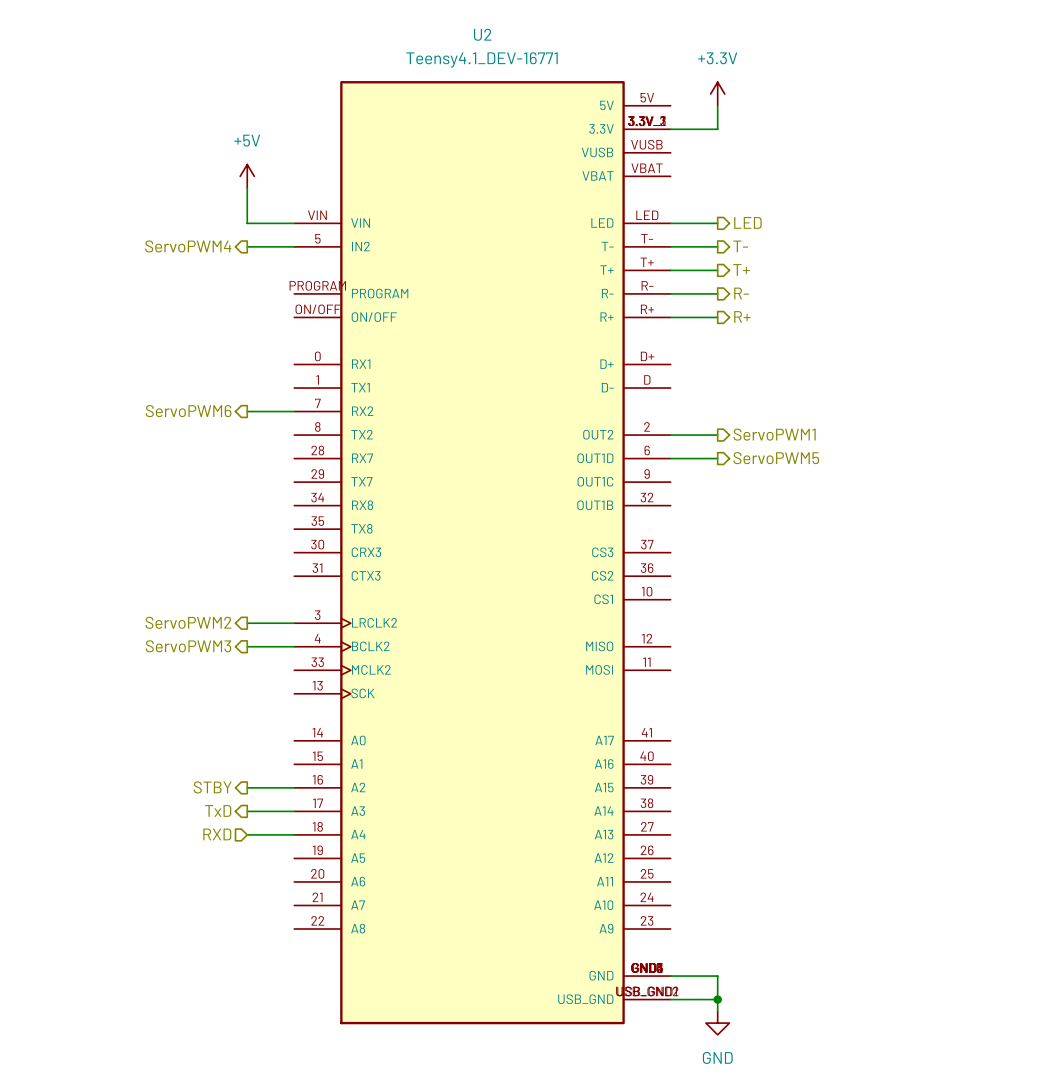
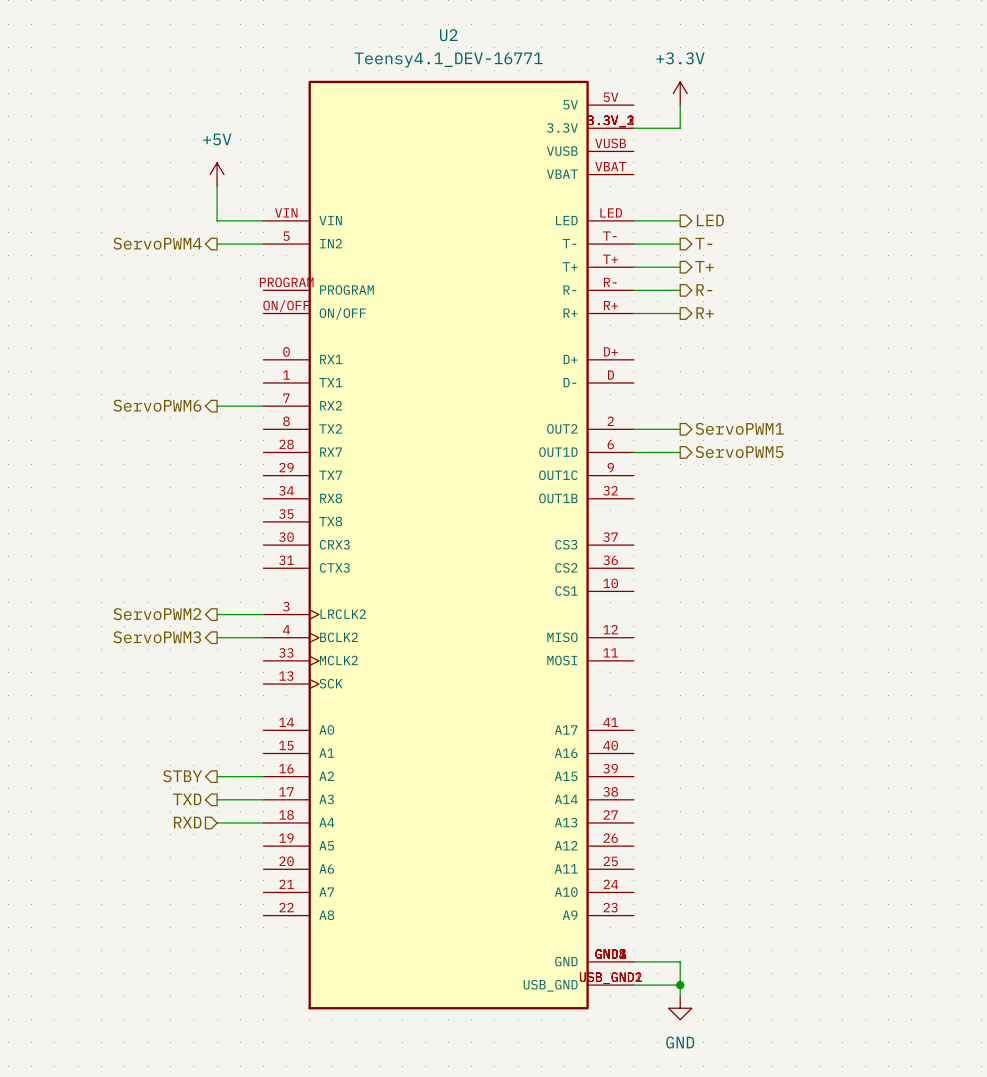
hierarchical label: TxD (218, 810) -> TXD (187, 799)

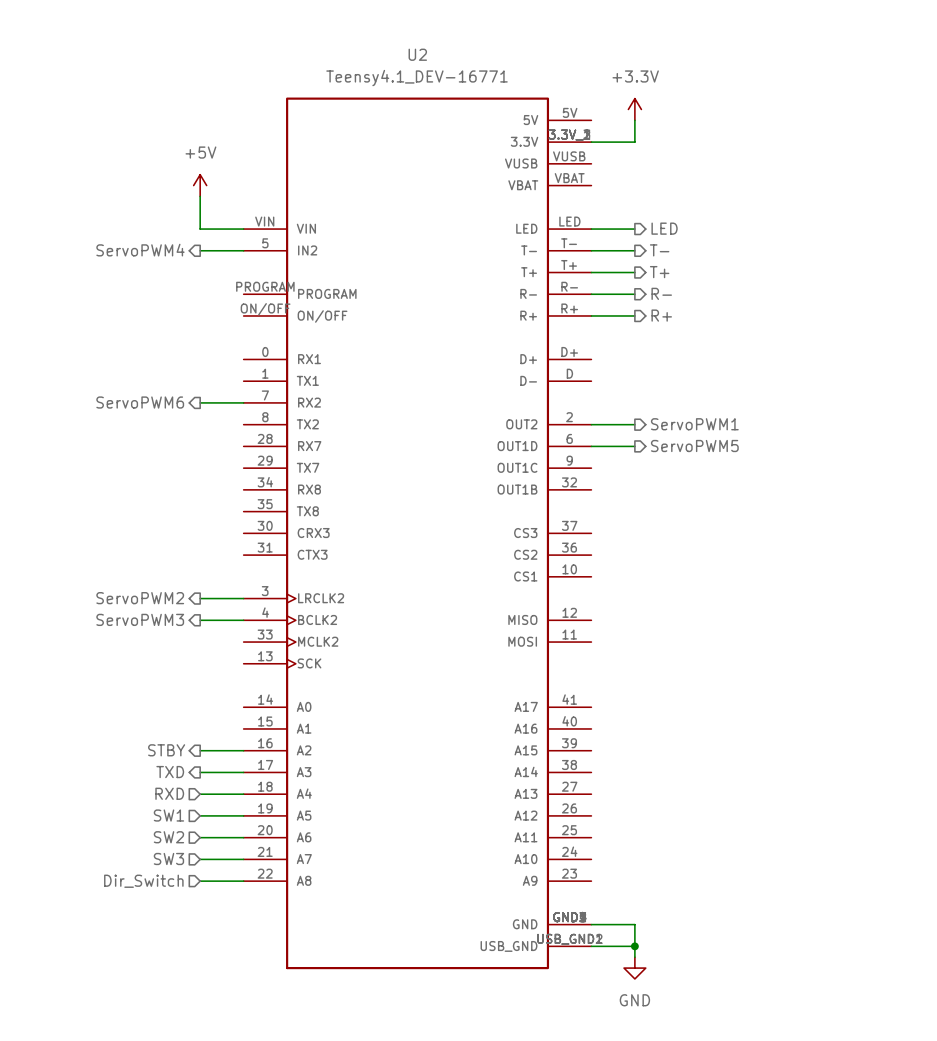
hierarchical label: none -> SW1 (168, 815)
wire: none -> (200, 815) (243, 815)
hierarchical label: none -> SW2 (168, 837)
wire: none -> (200, 837) (243, 837)
hierarchical label: none -> SW3 (168, 858)
wire: none -> (200, 859) (243, 859)
wire: none -> (200, 881) (243, 881)
hierarchical label: none -> Dir_Switch (143, 881)

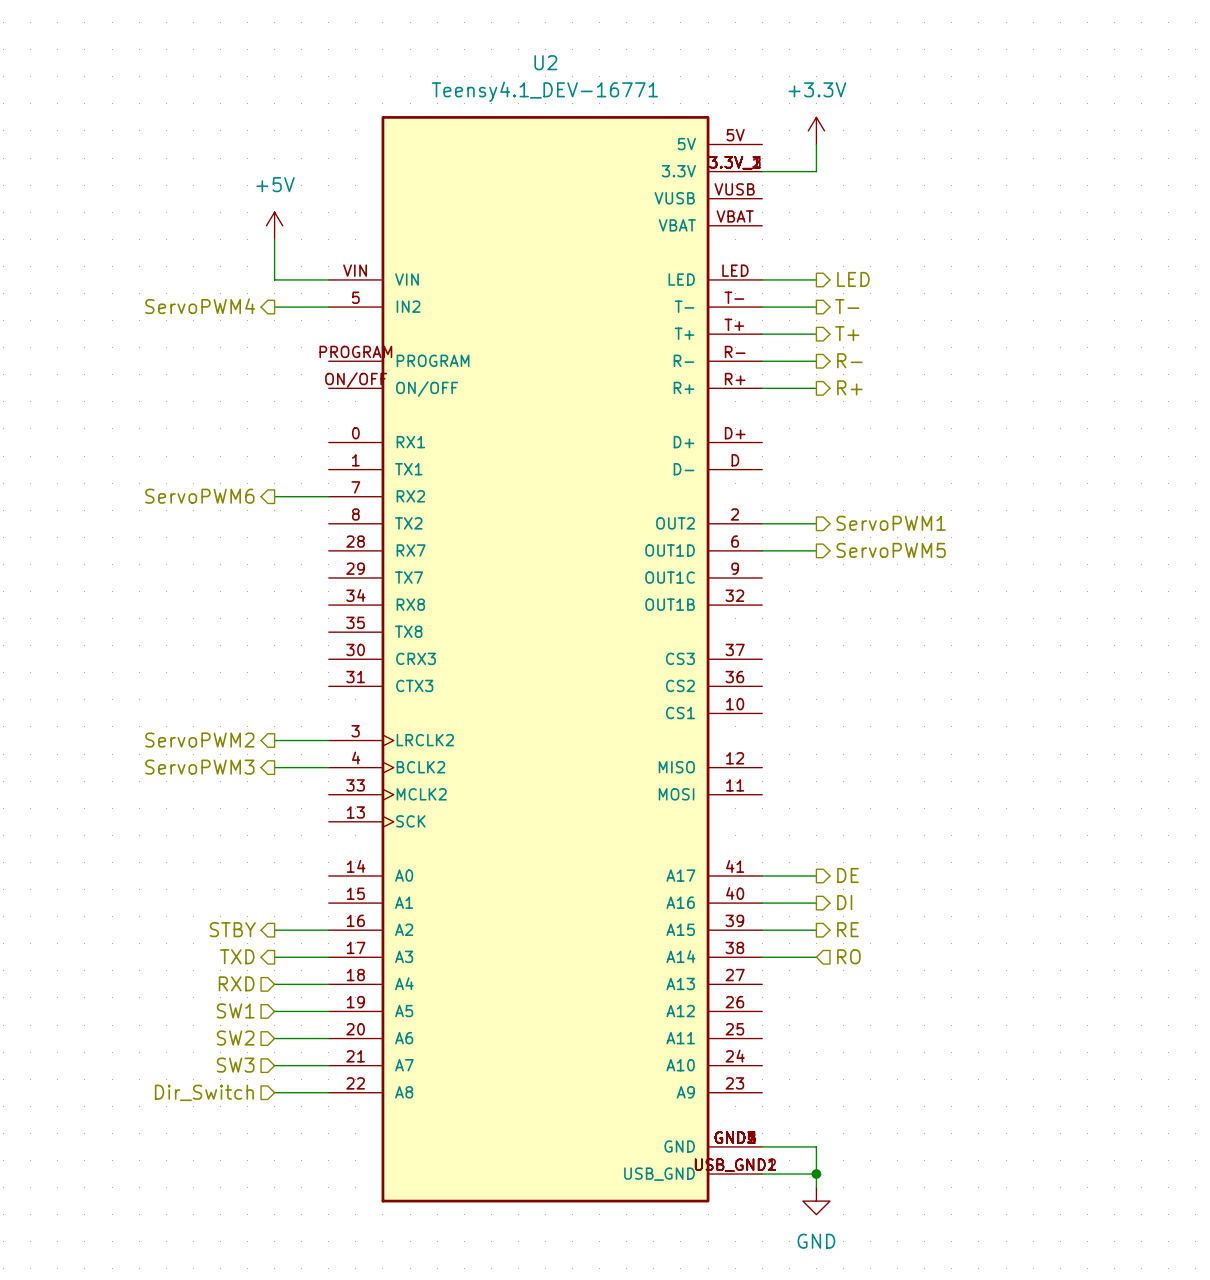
hierarchical label: none -> DE (847, 875)
wire: none -> (762, 875) (816, 875)
wire: none -> (762, 903) (816, 903)
hierarchical label: none -> DI (844, 902)
wire: none -> (762, 930) (816, 930)
hierarchical label: none -> RE (847, 929)
wire: none -> (762, 957) (816, 957)
hierarchical label: none -> RO (848, 956)

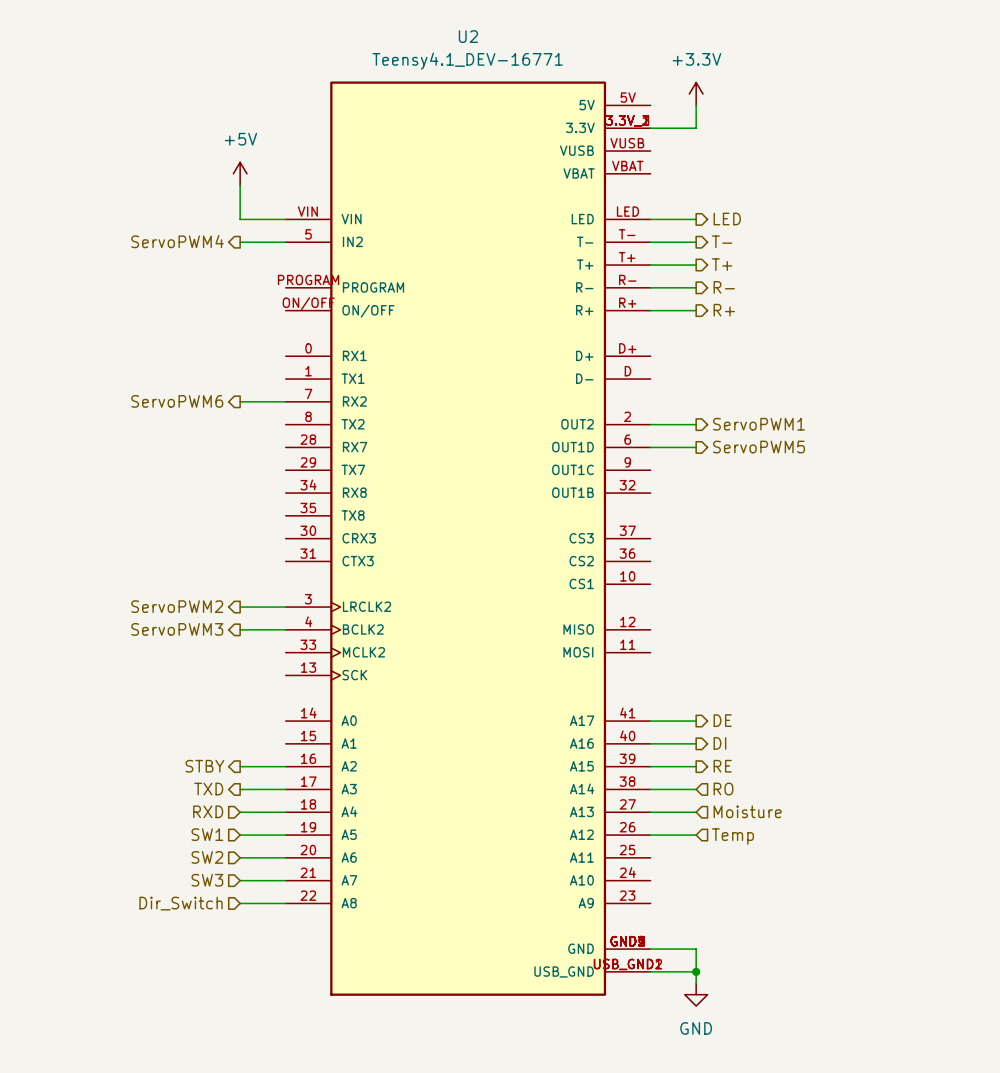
hierarchical label: none -> Moisture (747, 811)
wire: none -> (650, 812) (696, 812)
wire: none -> (650, 835) (696, 835)
hierarchical label: none -> Temp (732, 836)

